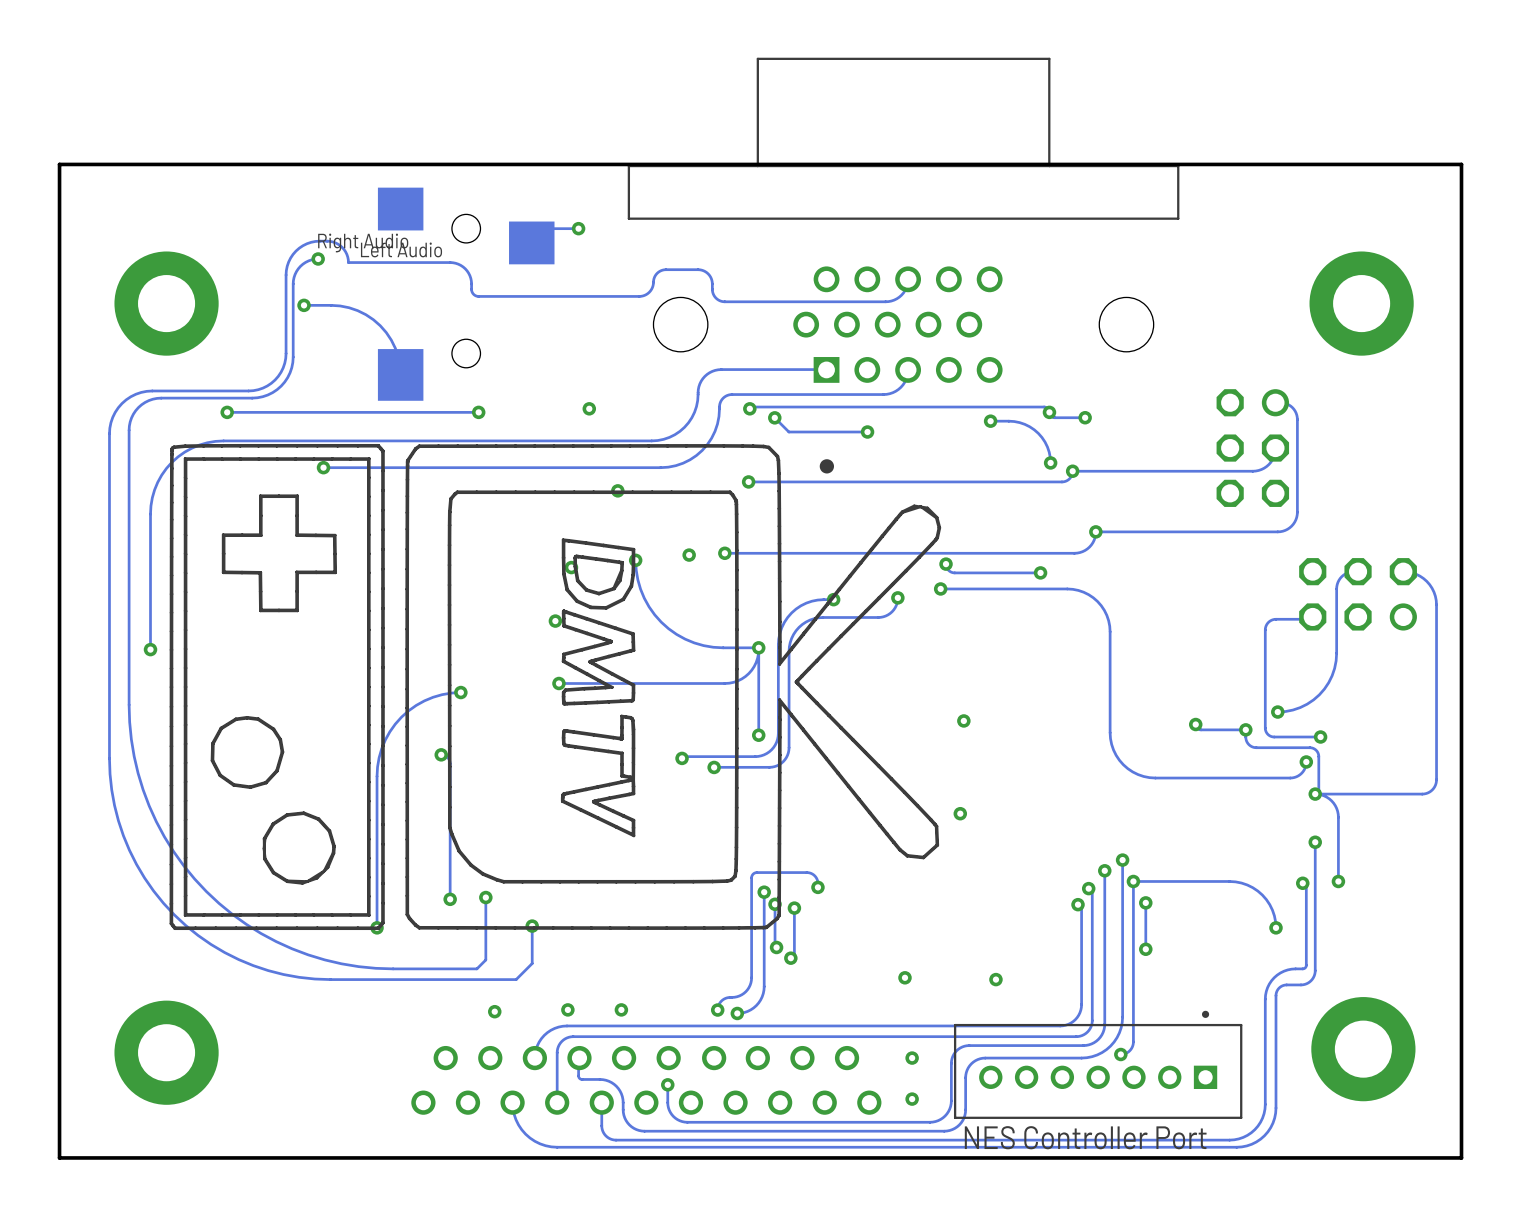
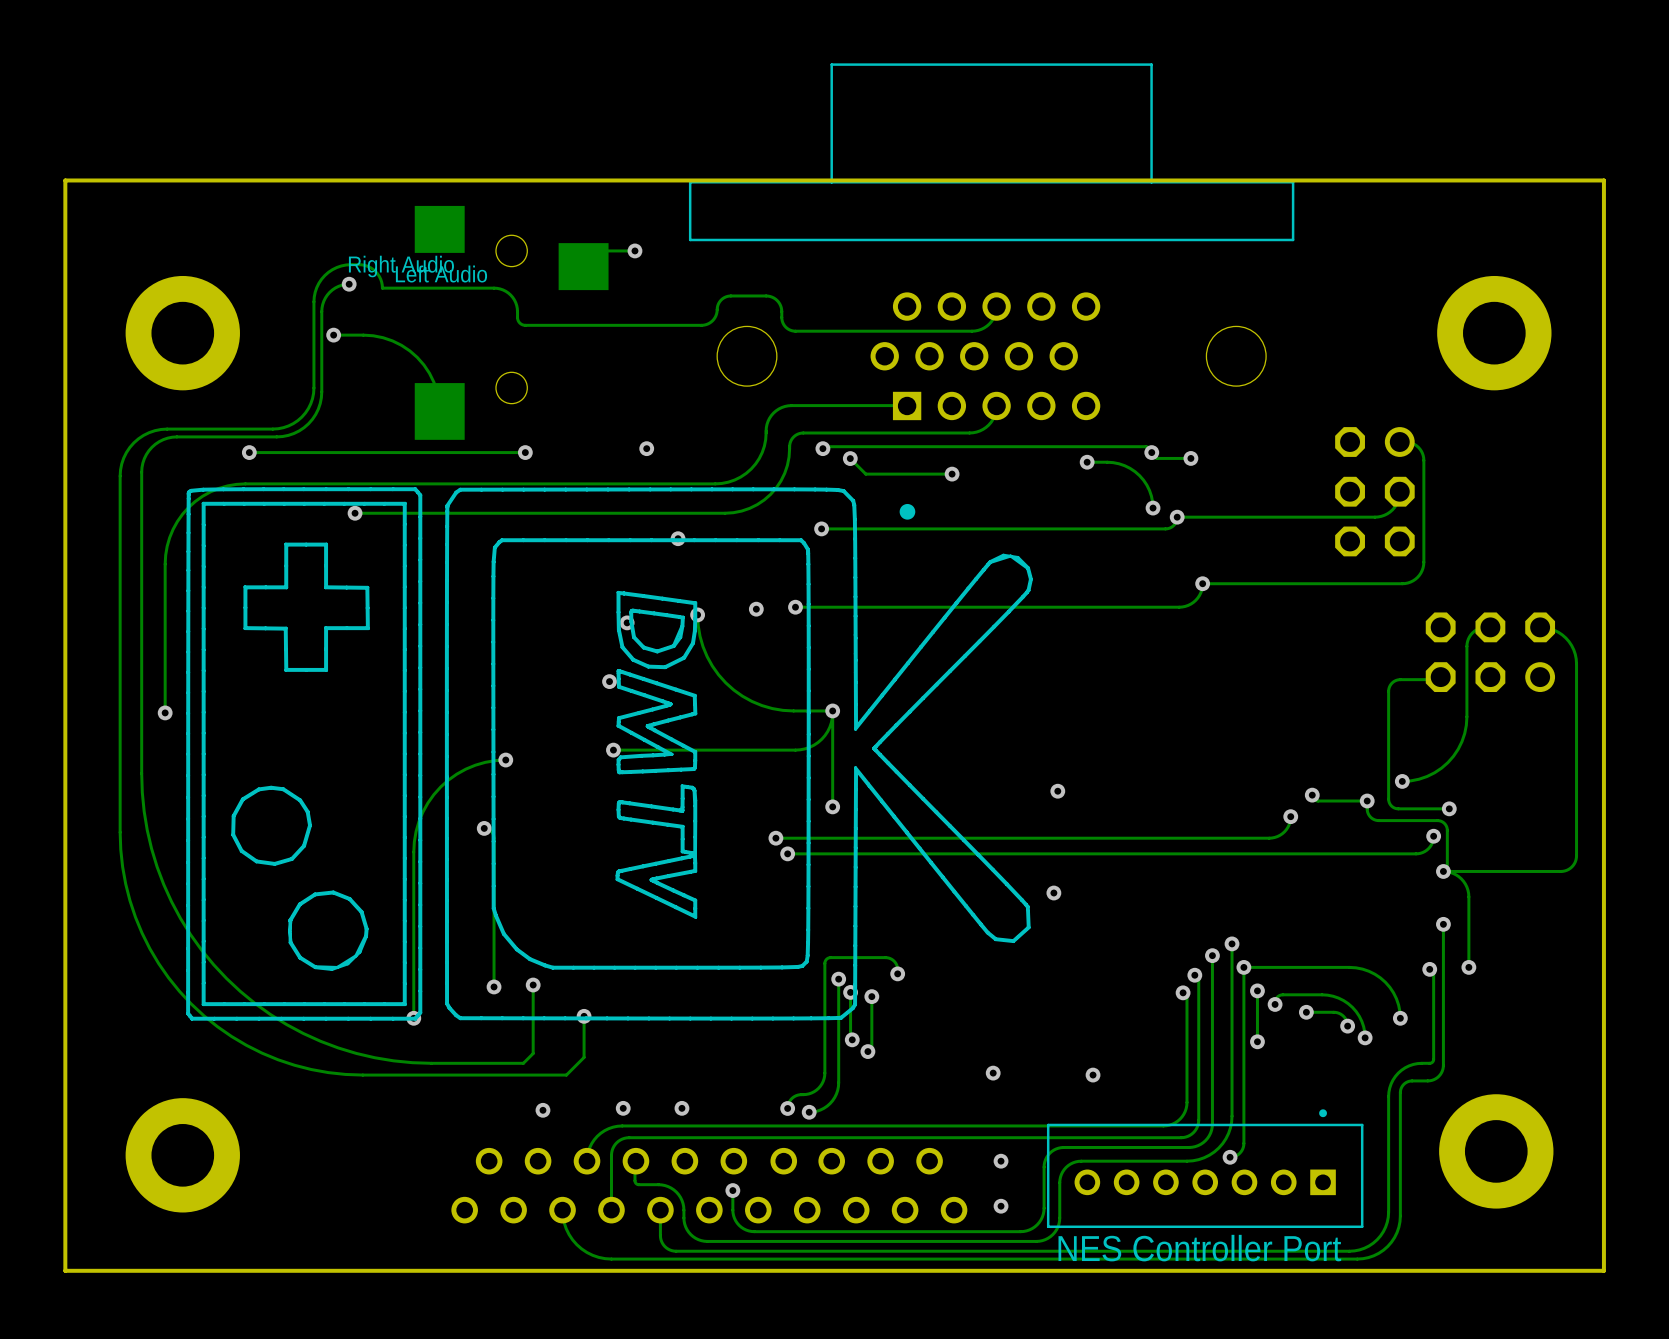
track: (946, 564) (948, 570) (953, 572) (1040, 572) -> none
via: (946, 564) -> none
via: (1040, 572) -> none
track: (940, 588) (1072, 589) (1088, 594) (1097, 601) (1104, 610) (1109, 626) (1111, 744) (1119, 760) (1127, 768) (1138, 774) (1155, 778) -> (787, 853) (1268, 853)
via: (940, 588) -> none
track: (897, 597) (893, 609) (883, 616) (818, 617) (809, 620) (798, 627) (791, 638) (789, 646) (789, 747) (786, 757) (779, 764) (771, 767) (714, 767) -> none
via: (897, 597) -> none
track: (833, 599) (817, 600) (801, 605) (787, 617) (781, 627) (778, 644) (778, 736) (771, 749) (758, 756) (683, 756) (682, 758) -> none
via: (833, 599) -> none
track: none -> (1290, 816) (1289, 824) (1284, 831) (1277, 836) (1269, 838) (775, 838)
via: none -> (1290, 816)
via: (682, 758) -> none
via: none -> (775, 838)
via: (714, 767) -> none
via: none -> (787, 853)
track: none -> (1275, 1004) (1276, 997) (1281, 994) (1322, 994) (1338, 998) (1348, 1003) (1359, 1016) (1365, 1037)
via: none -> (1275, 1004)
track: none -> (1306, 1012) (1337, 1012) (1344, 1017) (1347, 1026)
via: none -> (1306, 1012)
via: none -> (1347, 1026)
via: none -> (1365, 1037)

